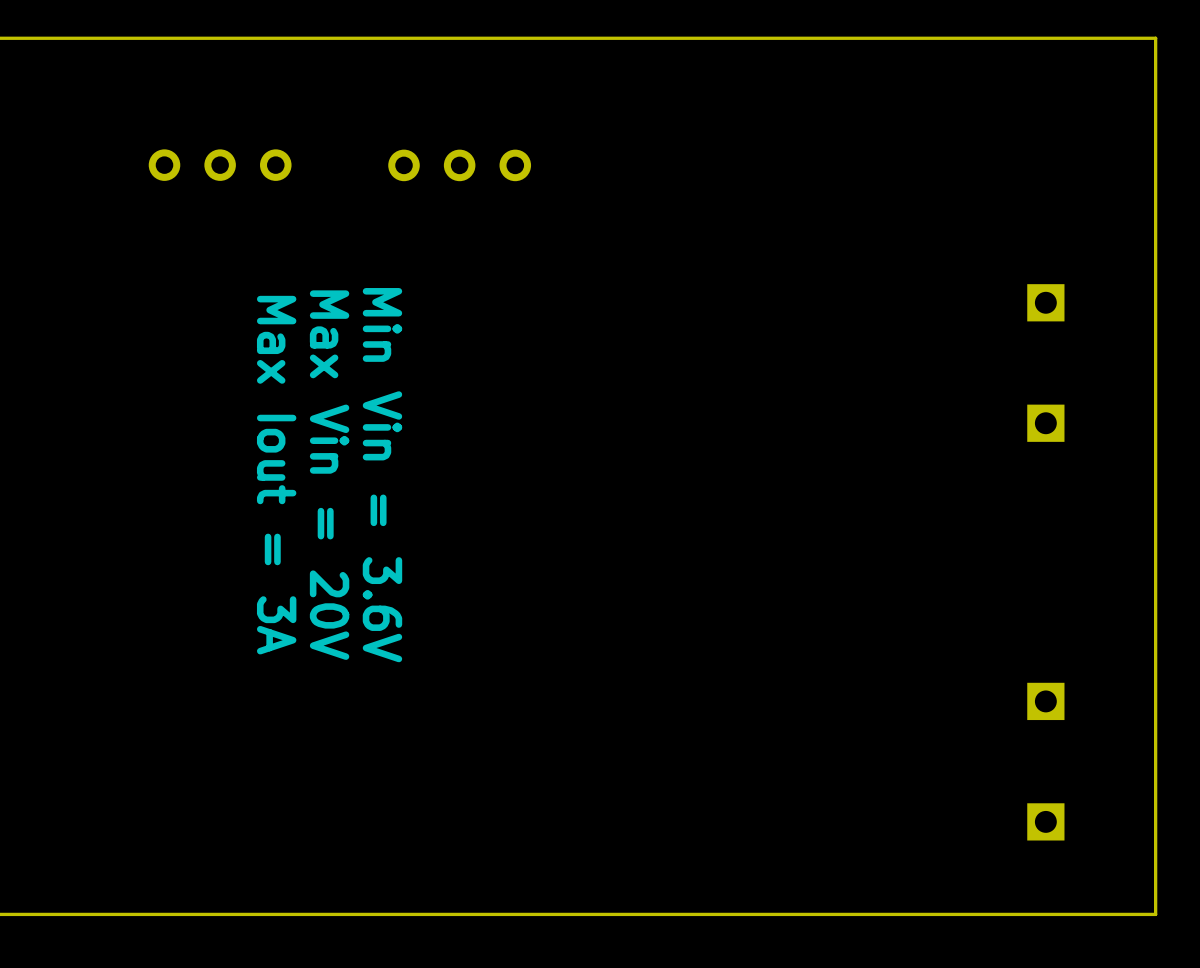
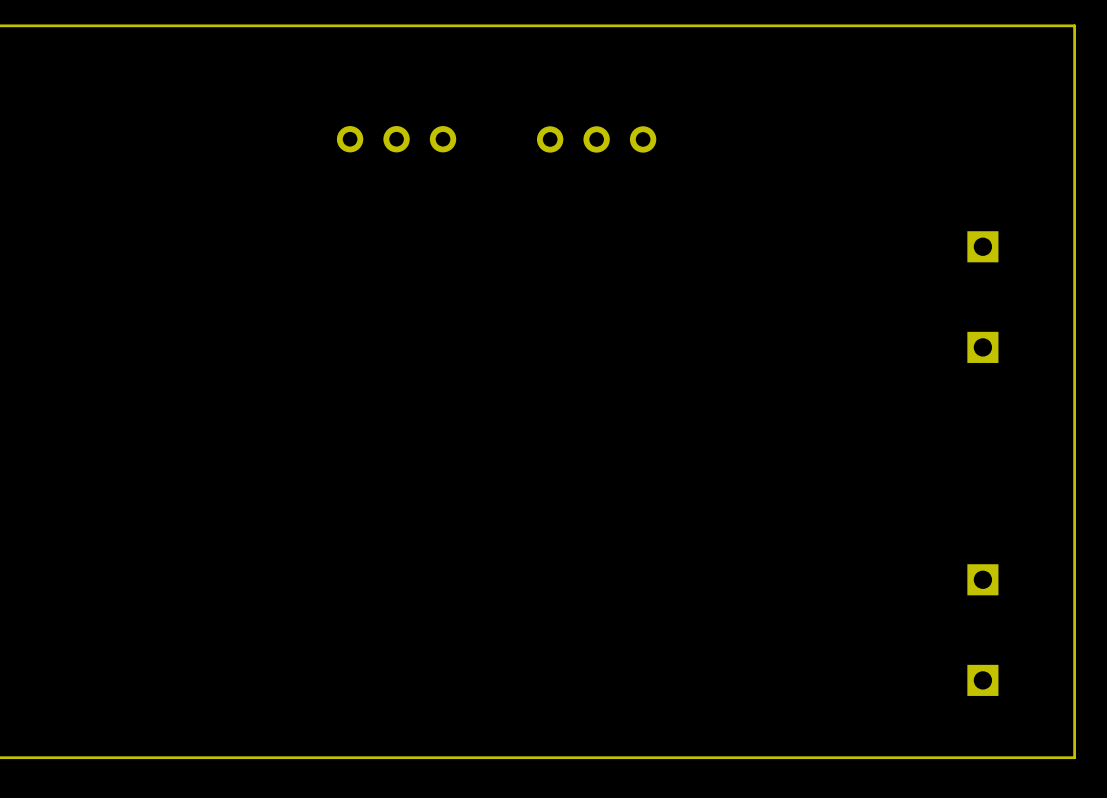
part: (220, 165) -> none
part: (459, 165) -> none
part: none -> (396, 139)
part: none -> (596, 139)
text: Max Iout = 3A (276, 475) -> none
text: Max Vin = 20V (329, 475) -> none
text: Min Vin = 3.6V (382, 475) -> none

